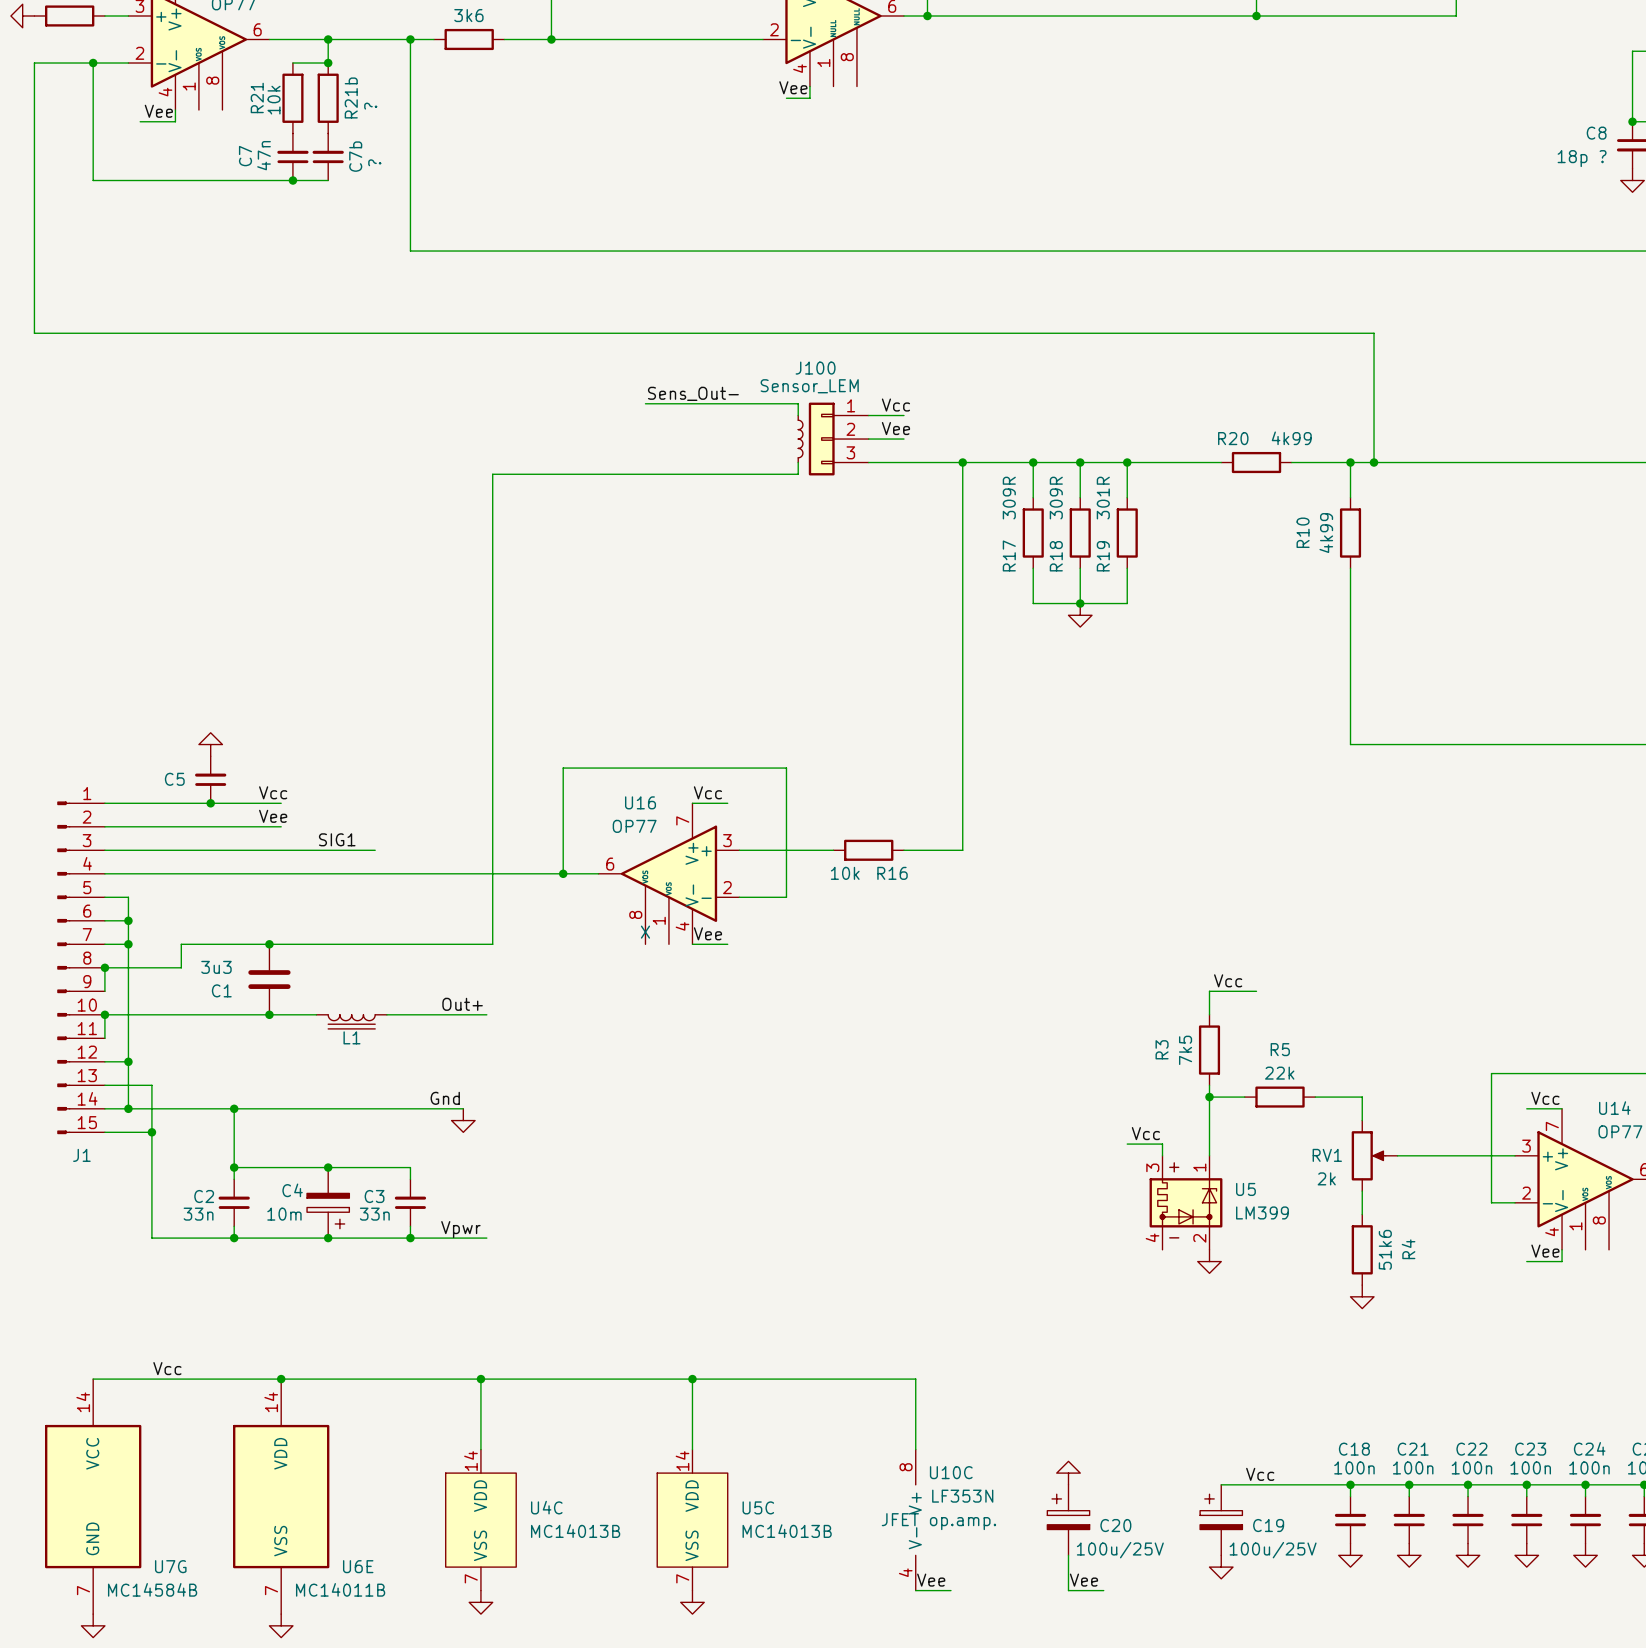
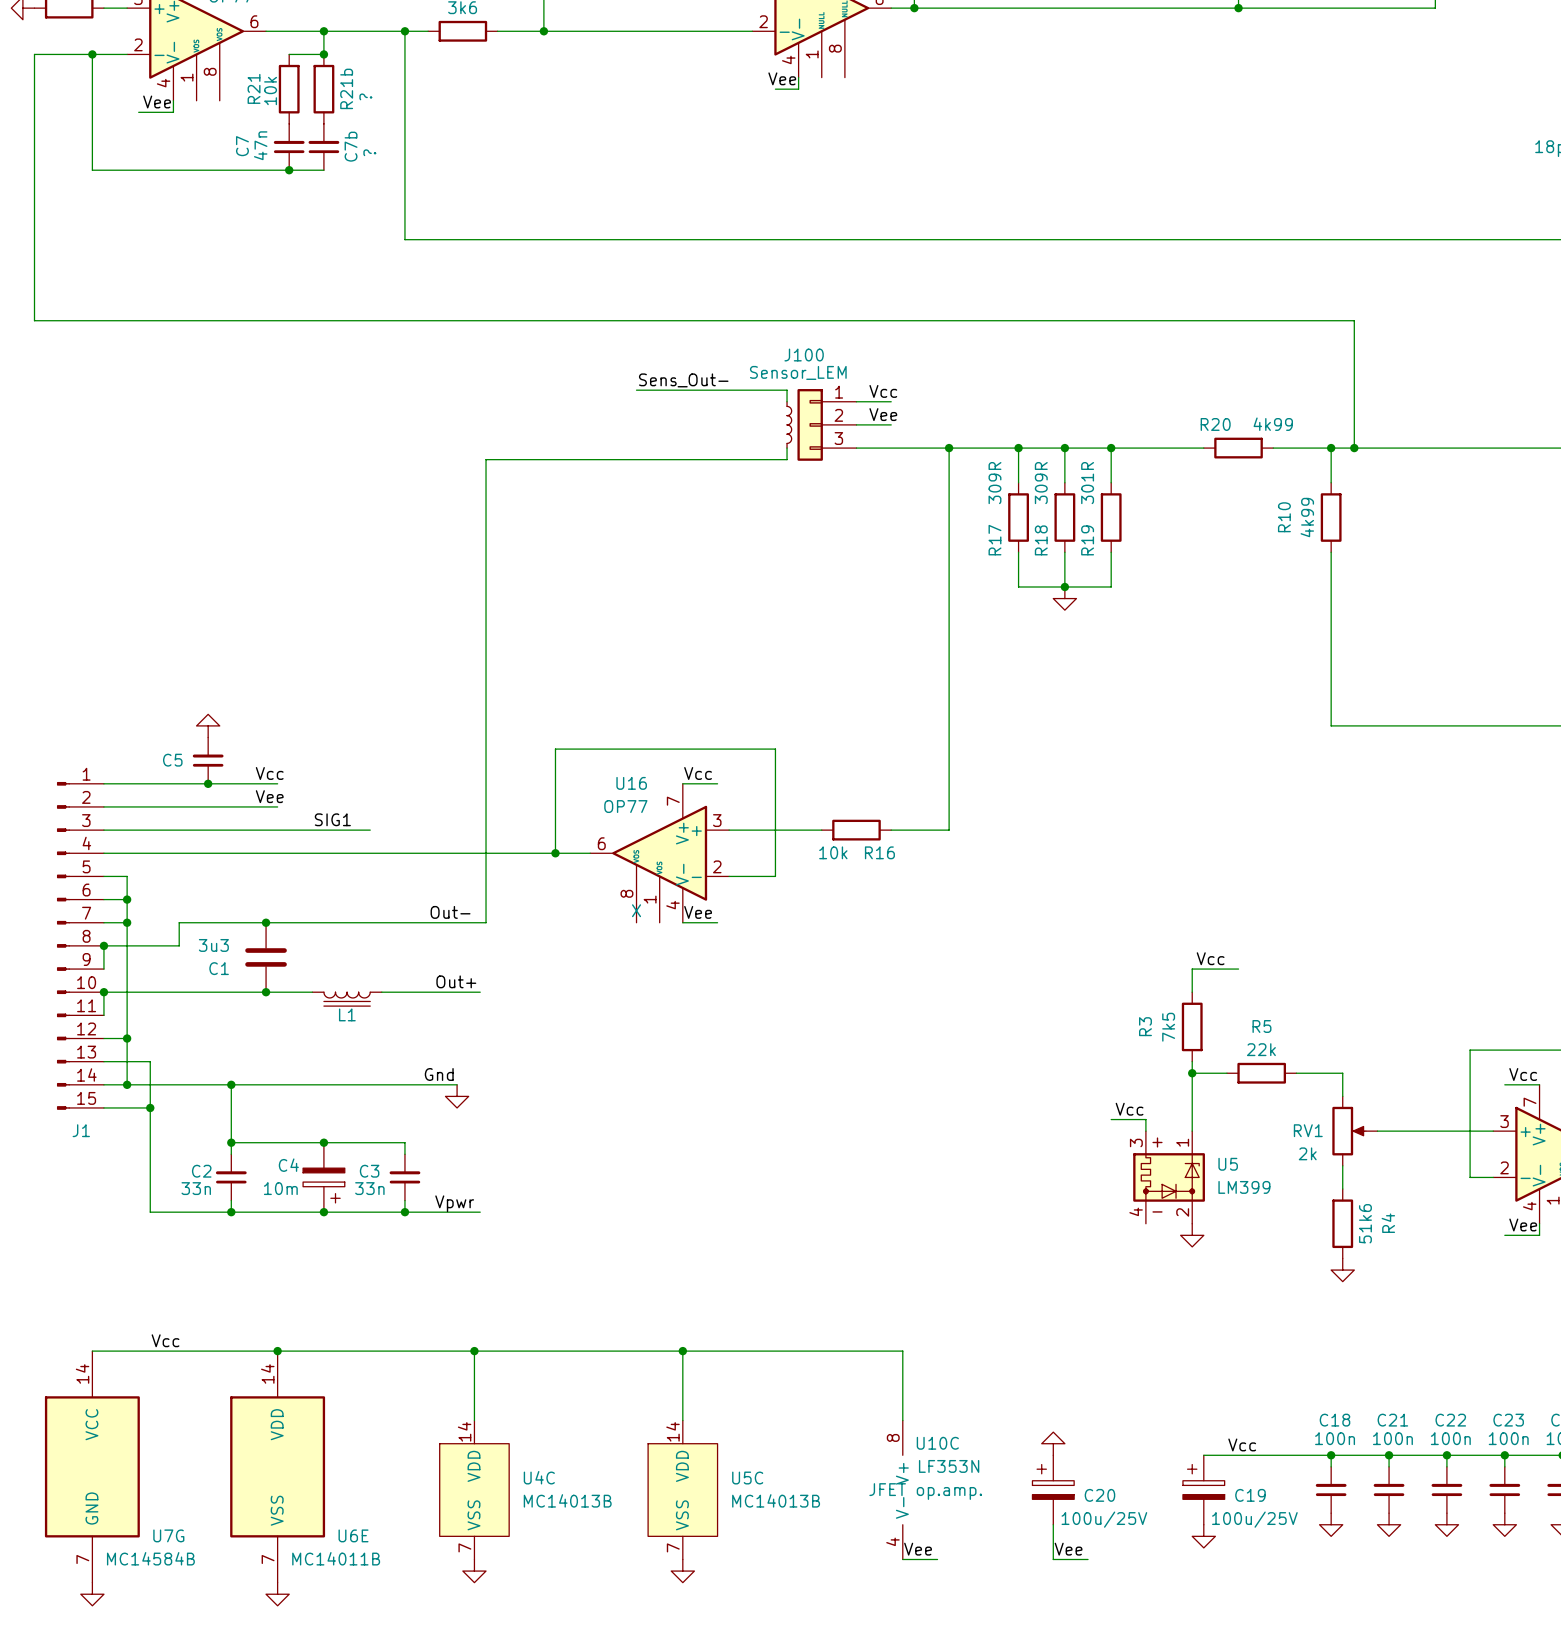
label: none -> Out- (450, 912)

